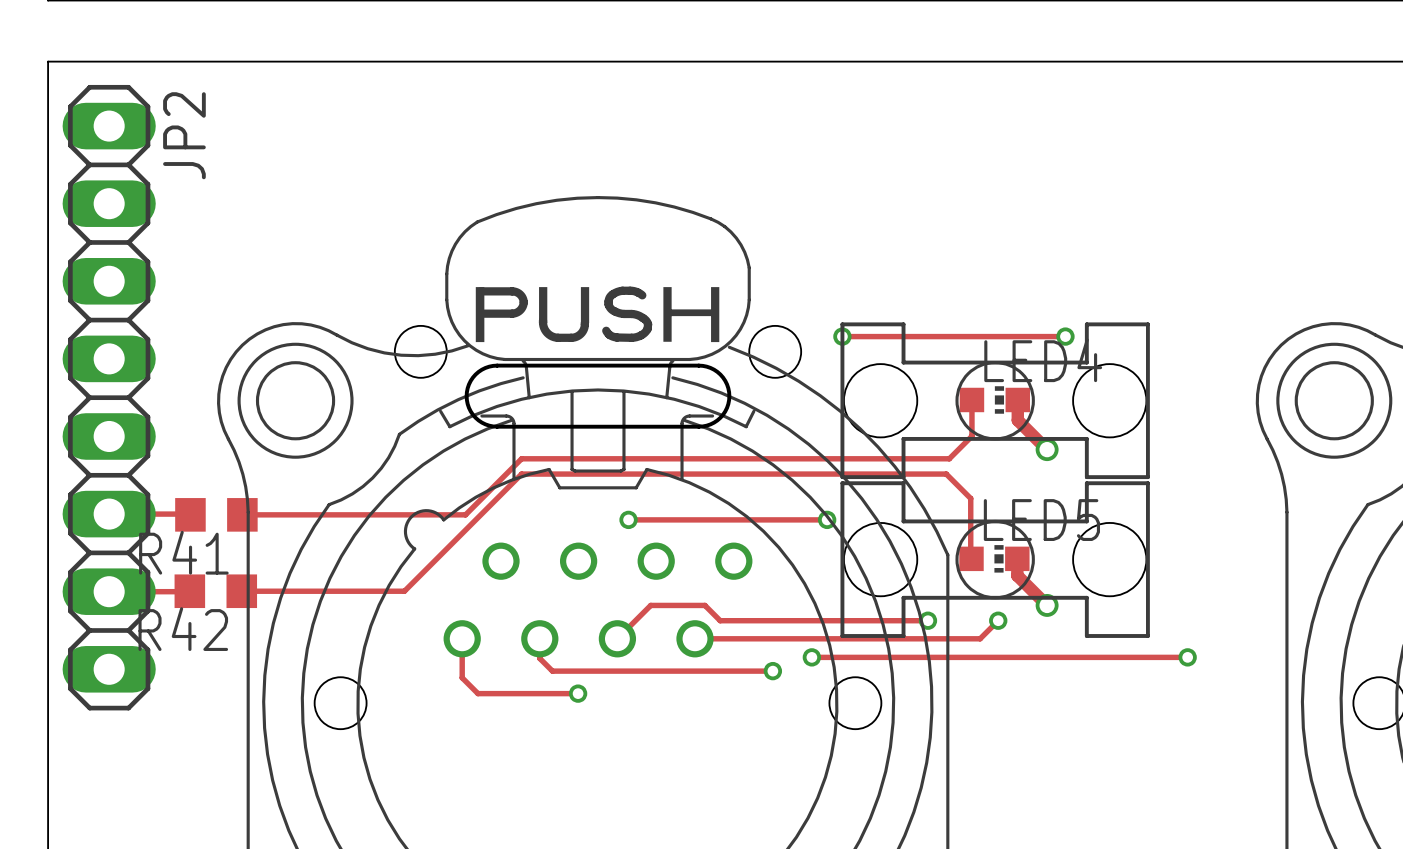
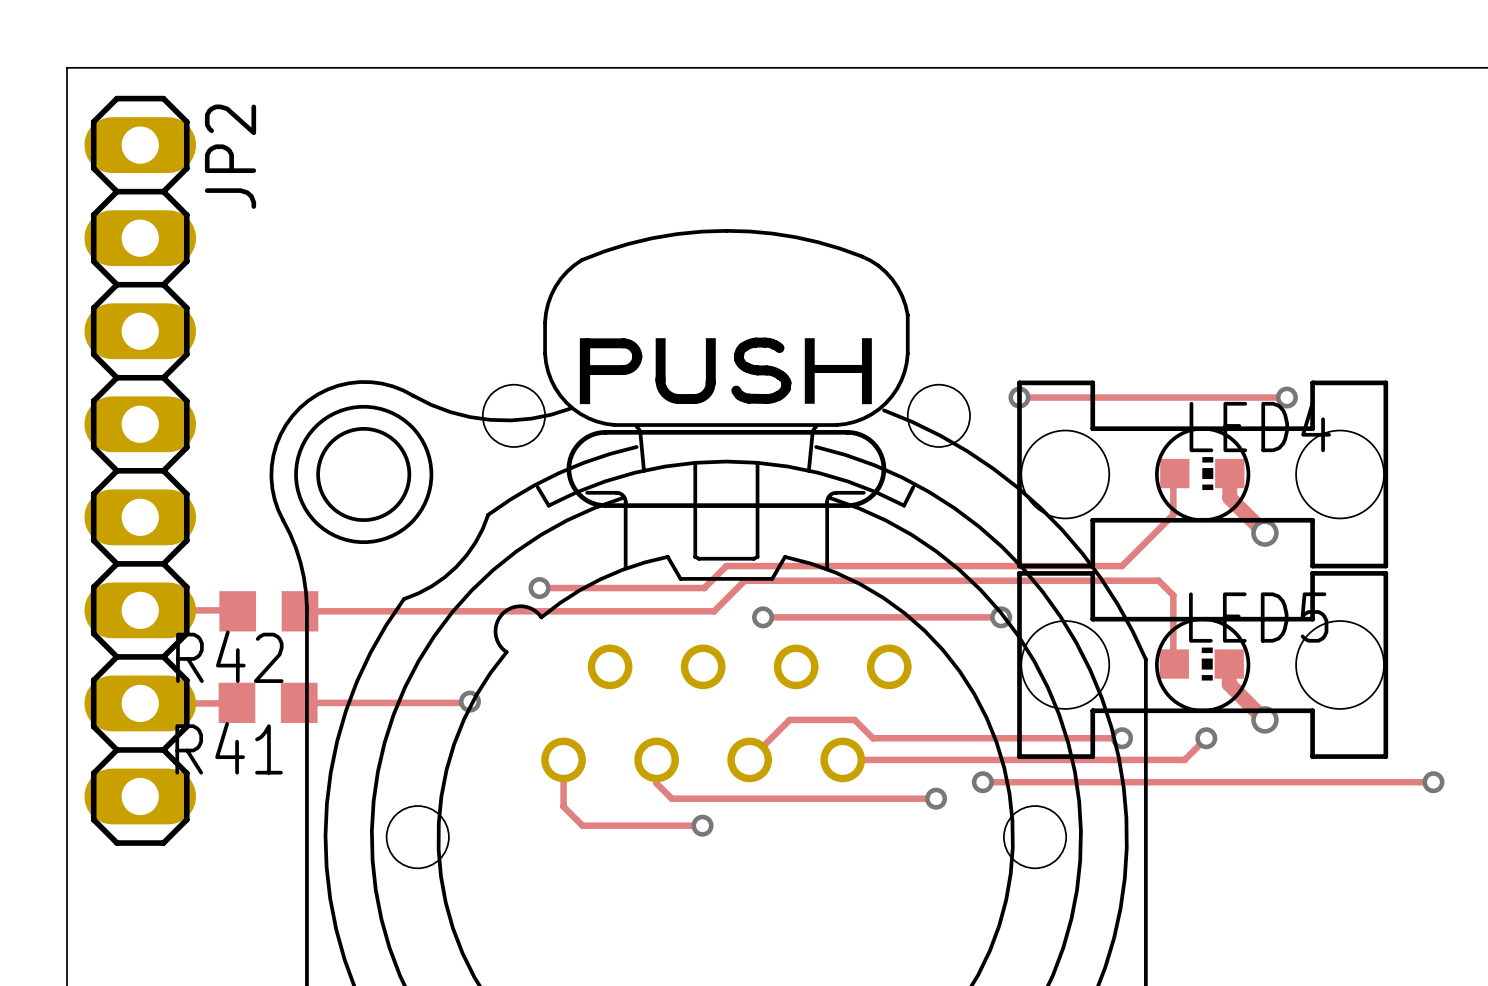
track: (971, 399) (971, 436) (949, 458) (521, 458) (465, 514) -> (1174, 473) (1173, 514) (1122, 566) (726, 566) (704, 588) (539, 588)
via: none -> (539, 588)
track: (970, 501) (970, 498) (946, 474) (521, 474) (404, 591) (383, 591) -> (1173, 595) (1158, 580) (744, 580) (714, 611) (567, 611)
R41 name: R41 (183, 552) -> R42 (229, 656)
via: none -> (469, 701)
R42 name: R42 (183, 629) -> R41 (229, 748)

